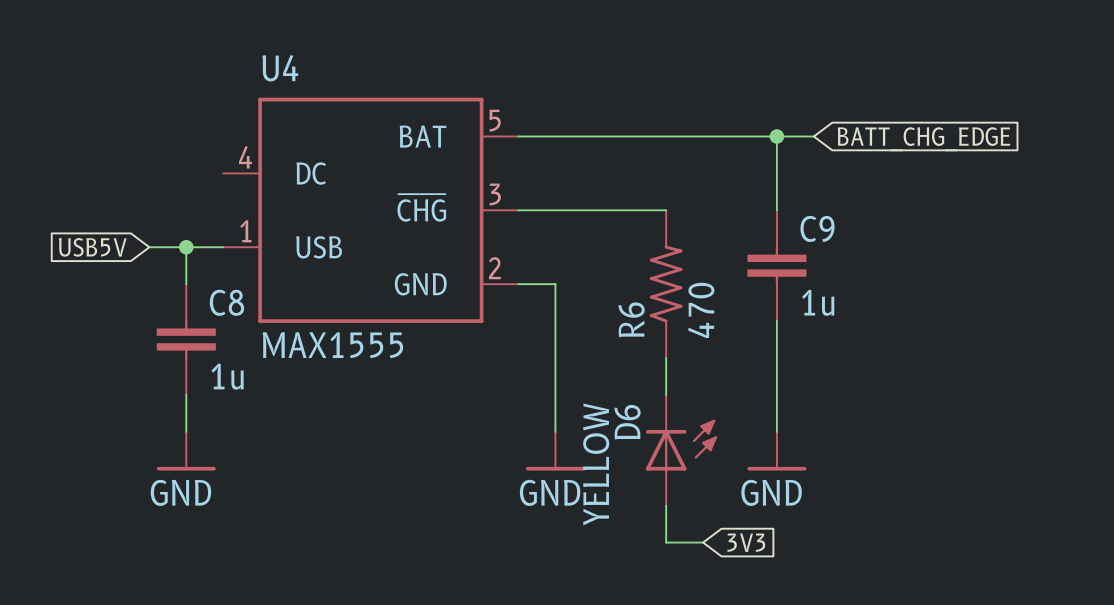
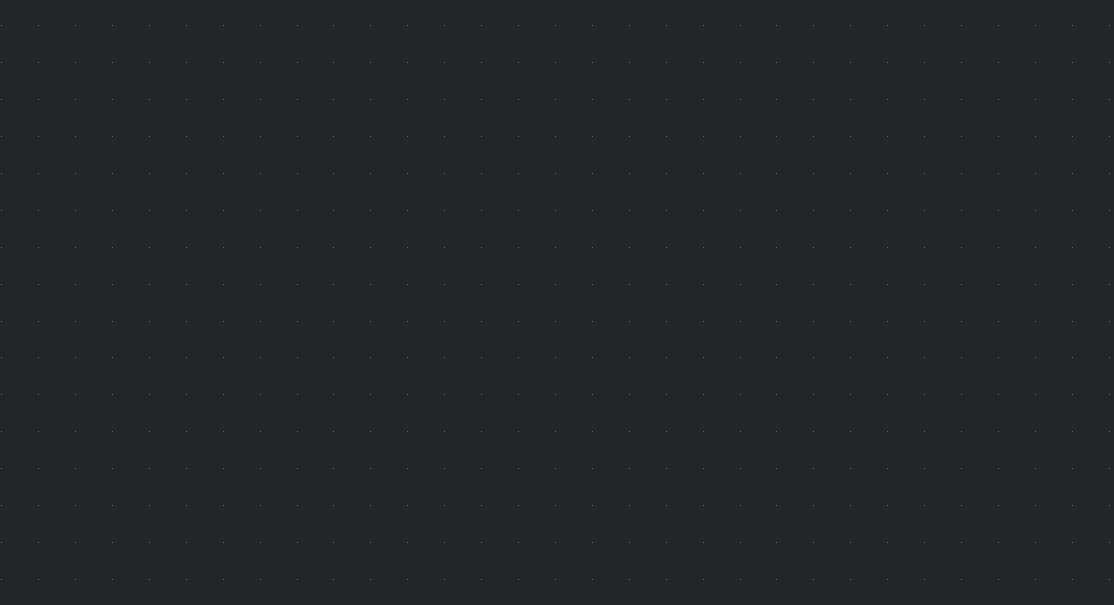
wire: (518, 136) (813, 136) -> none
wire: (776, 136) (776, 210) -> none
junction: (776, 136) -> none
global label: BATT_CHG_EDGE (923, 139) -> none
U4: MAX1555 (370, 210) -> none
wire: (518, 210) (666, 210) -> none
global label: USB5V (92, 247) -> none
wire: (149, 247) (223, 247) -> none
wire: (186, 247) (186, 284) -> none
junction: (186, 247) -> none
C9: 1u (776, 265) -> none
wire: (518, 284) (555, 284) (555, 431) -> none
R6: 470 (666, 284) -> none
wire: (776, 321) (776, 431) -> none
C8: 1u (186, 339) -> none
wire: (666, 357) (666, 394) -> none
wire: (186, 394) (186, 431) -> none
D6: YELLOW (681, 450) -> none
power symbol: GND (186, 451) -> none
power symbol: GND (555, 451) -> none
power symbol: GND (776, 451) -> none
wire: (666, 505) (666, 542) (703, 542) -> none
global label: 3V3 (746, 542) -> none

